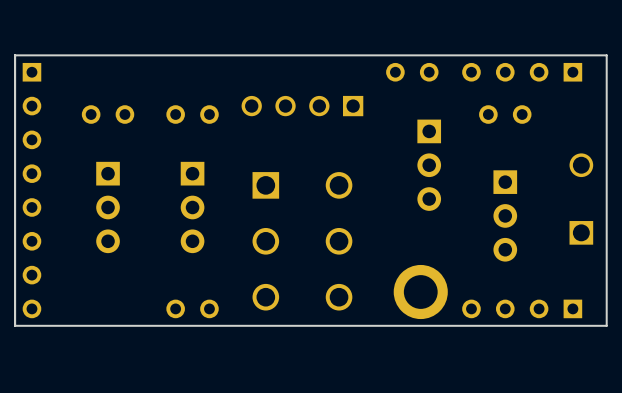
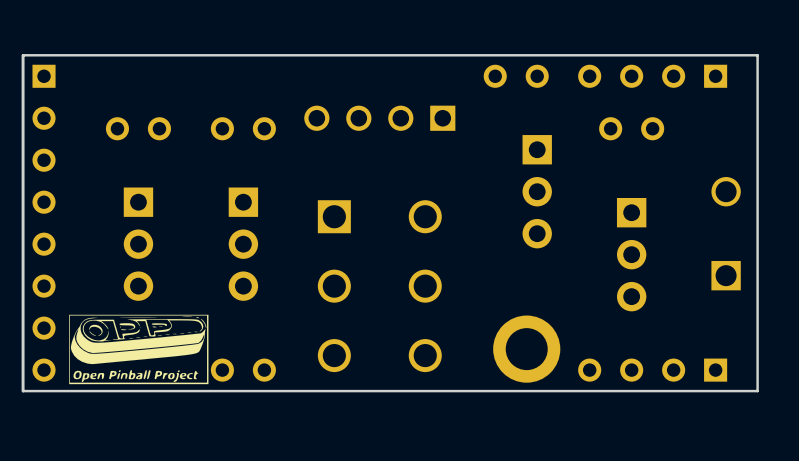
drawing: none -> [69, 314, 209, 385]

